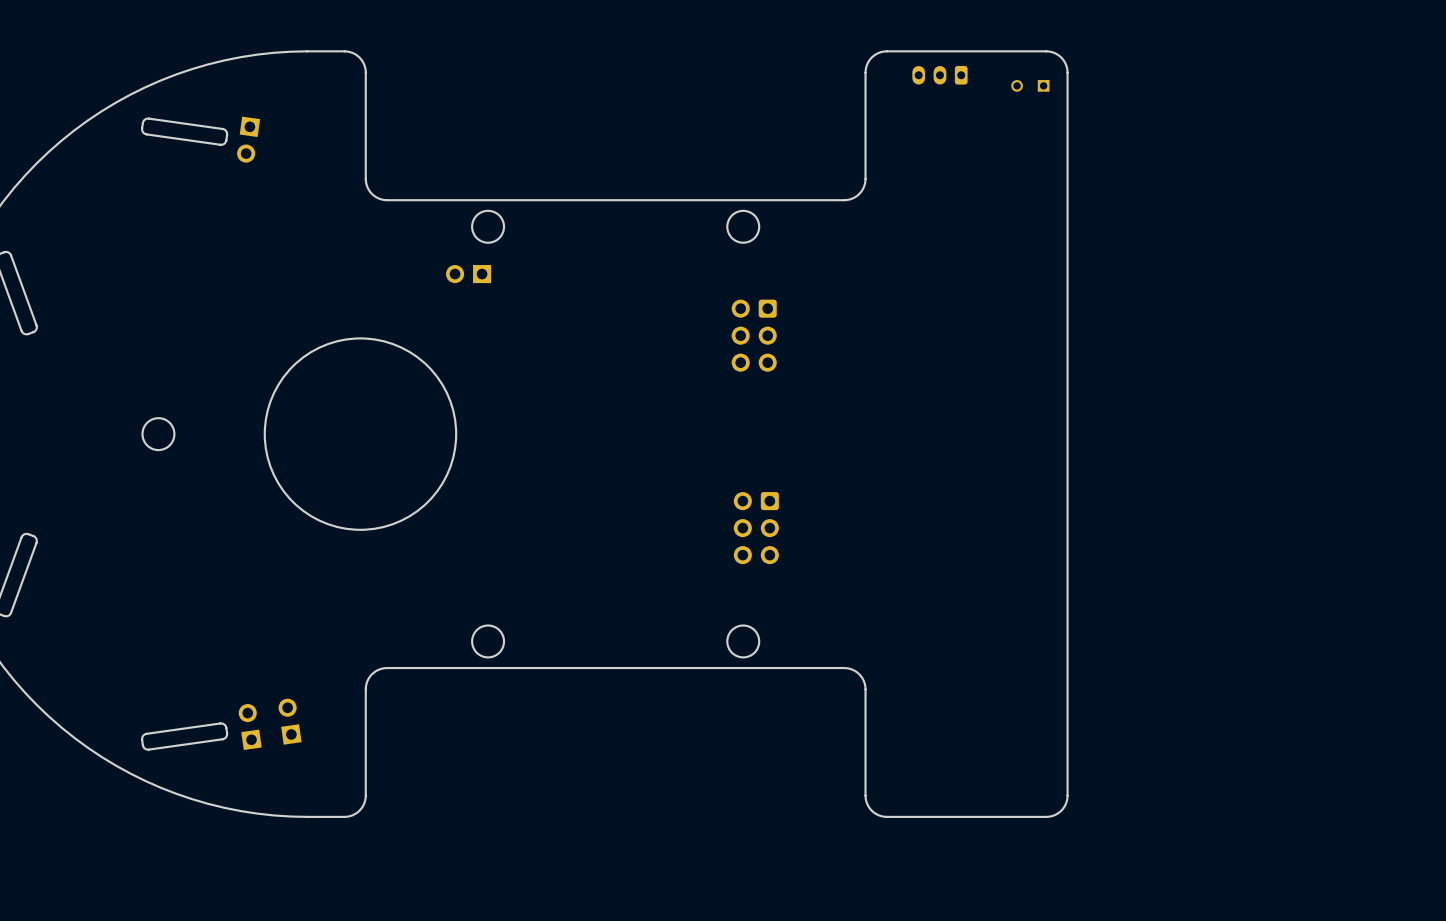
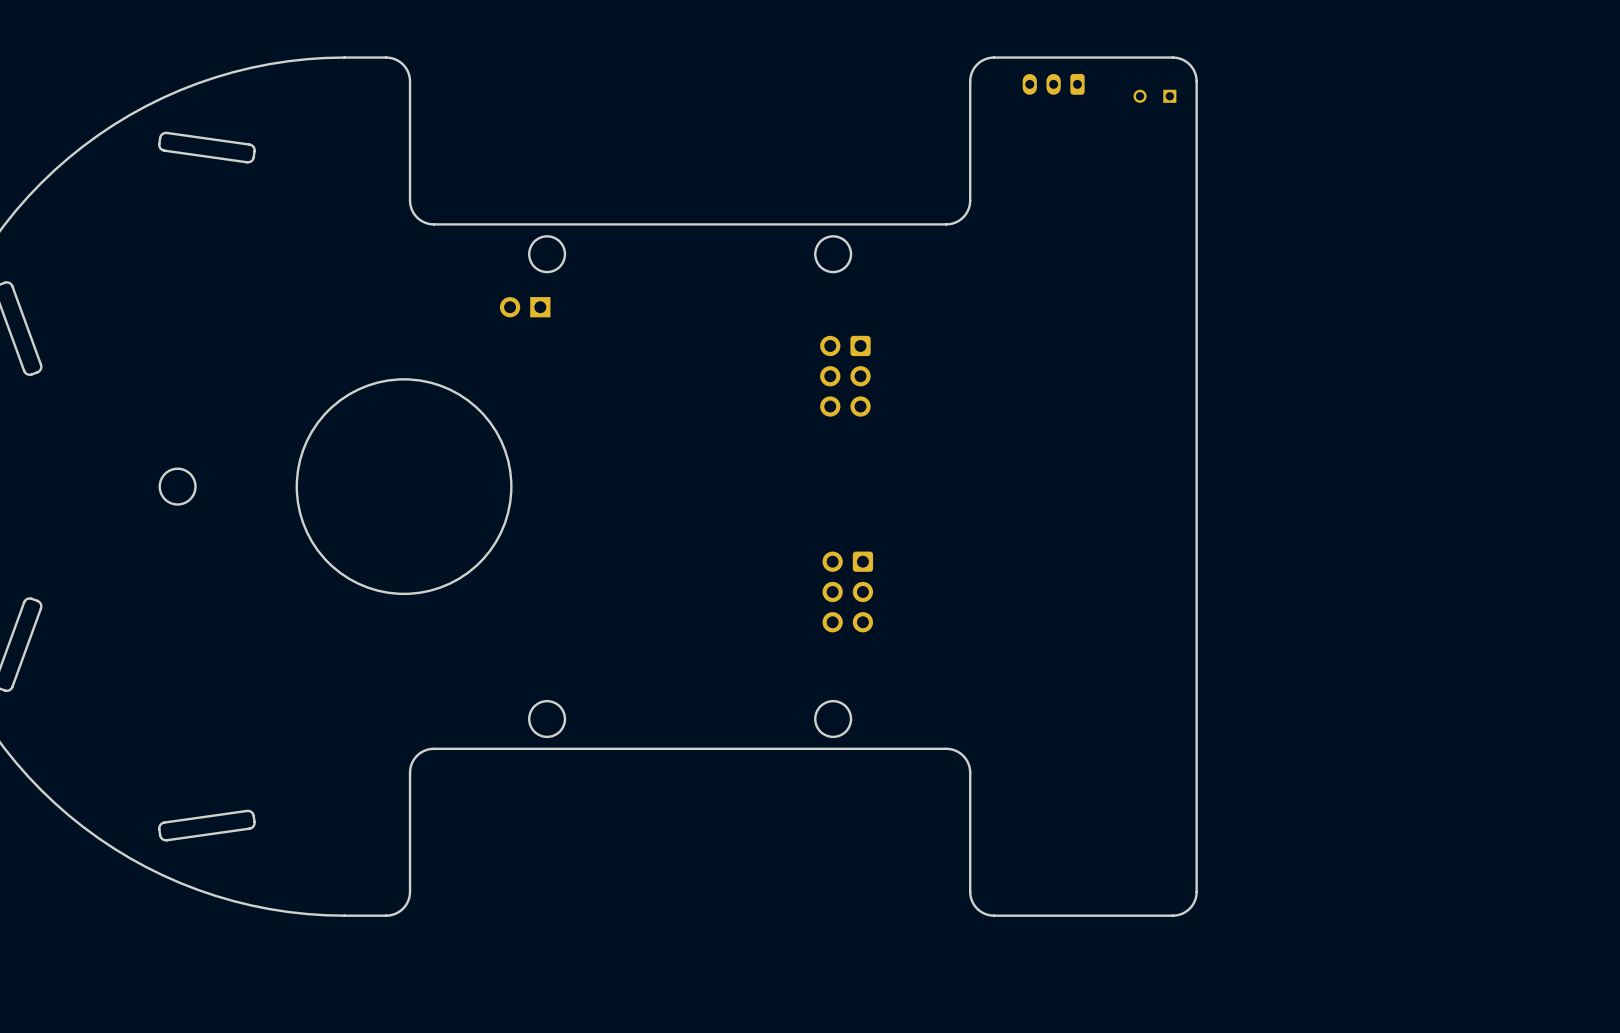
part: (248, 139) -> none
part: (290, 721) -> none
part: (250, 727) -> none

